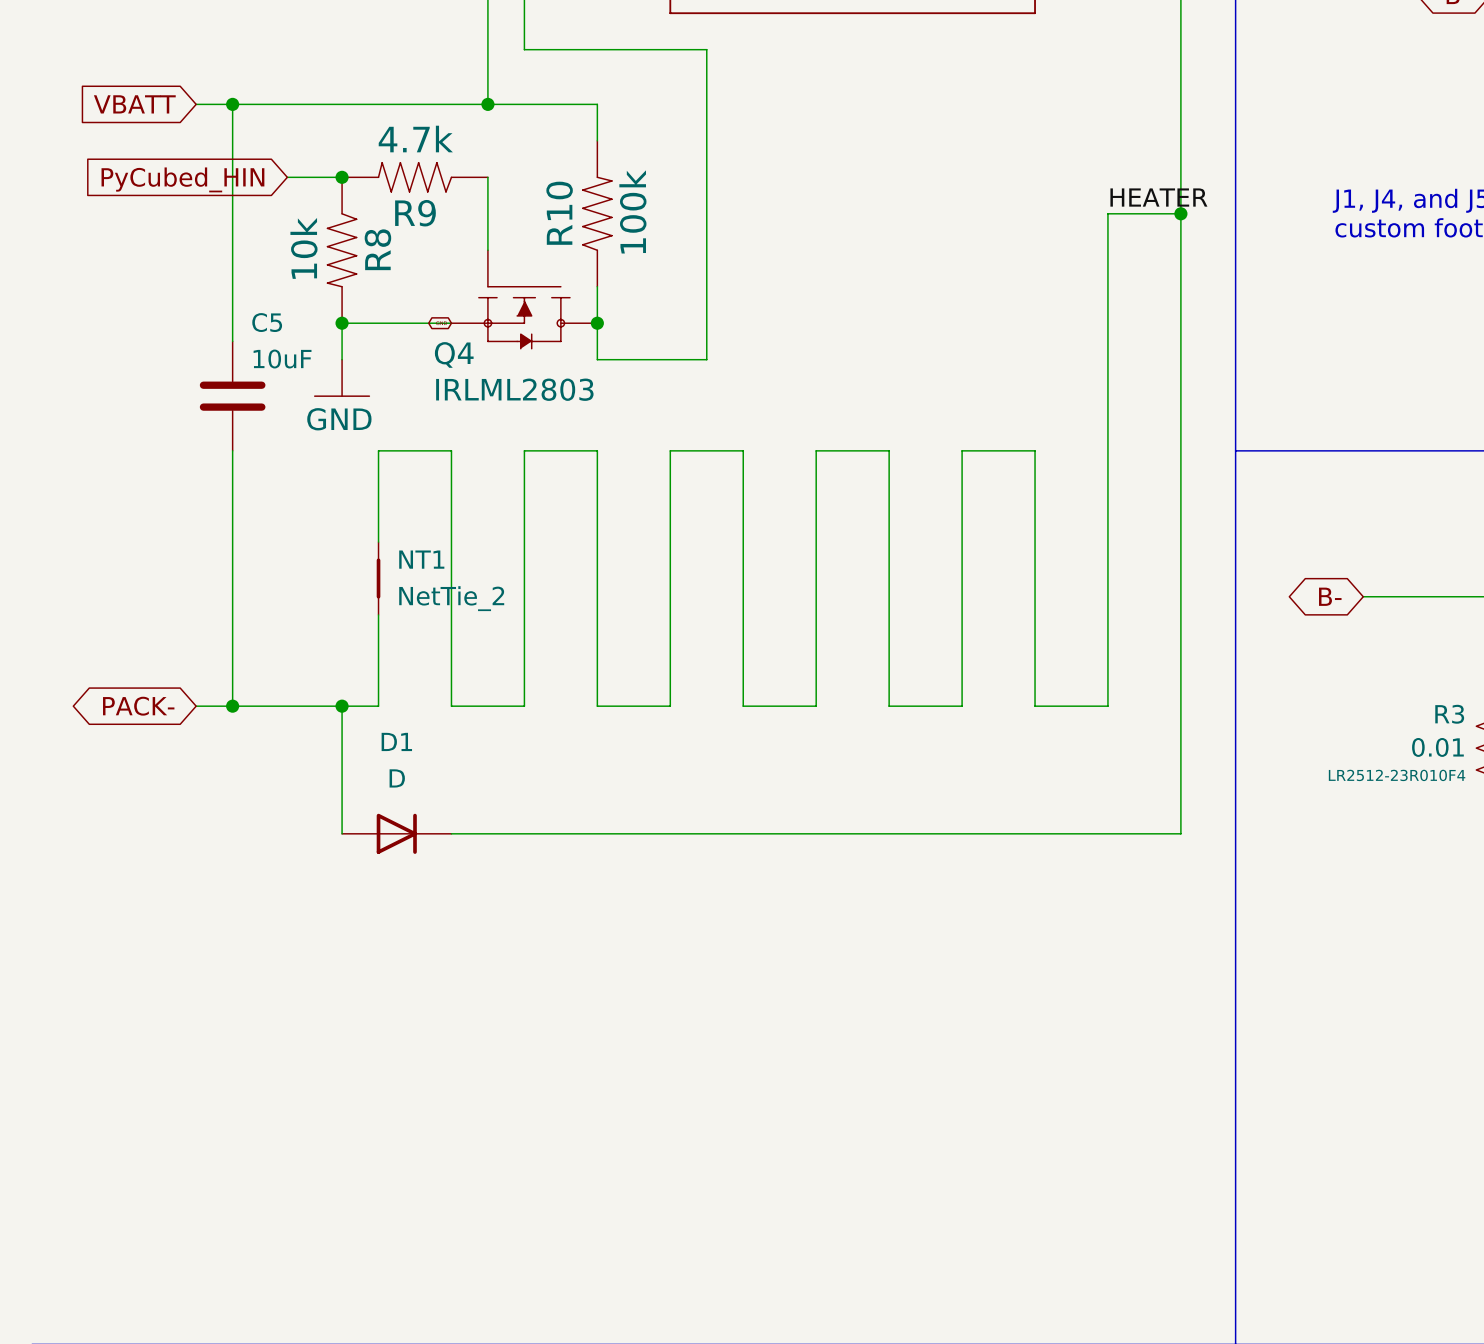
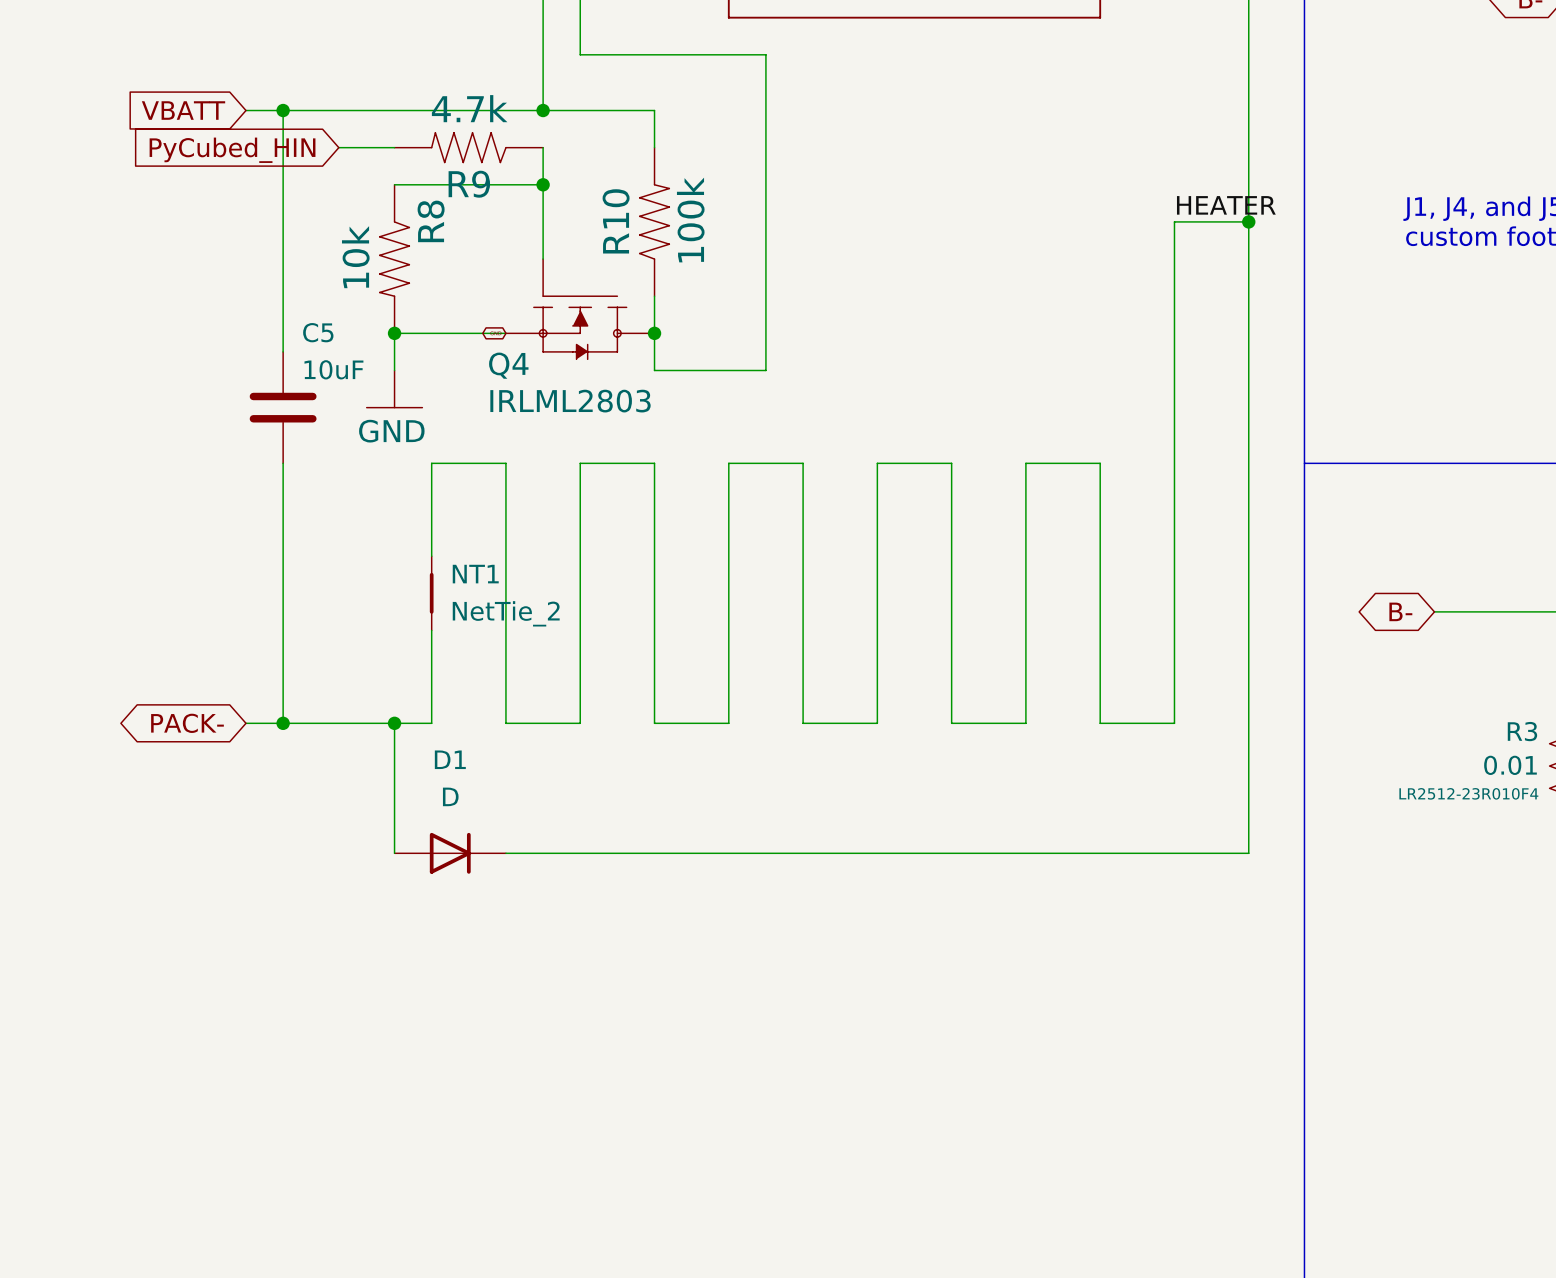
wire: none -> (338, 147) (394, 147)
wire: (287, 177) (342, 177) -> (543, 147) (543, 184) (394, 184)
junction: (342, 177) -> none
R9 position: (414, 177) -> (468, 147)
junction: none -> (543, 184)
global label position: PyCubed_HIN (182, 179) -> PyCubed_HIN (232, 150)
R8 name position: R8 (377, 249) -> R8 (431, 221)

